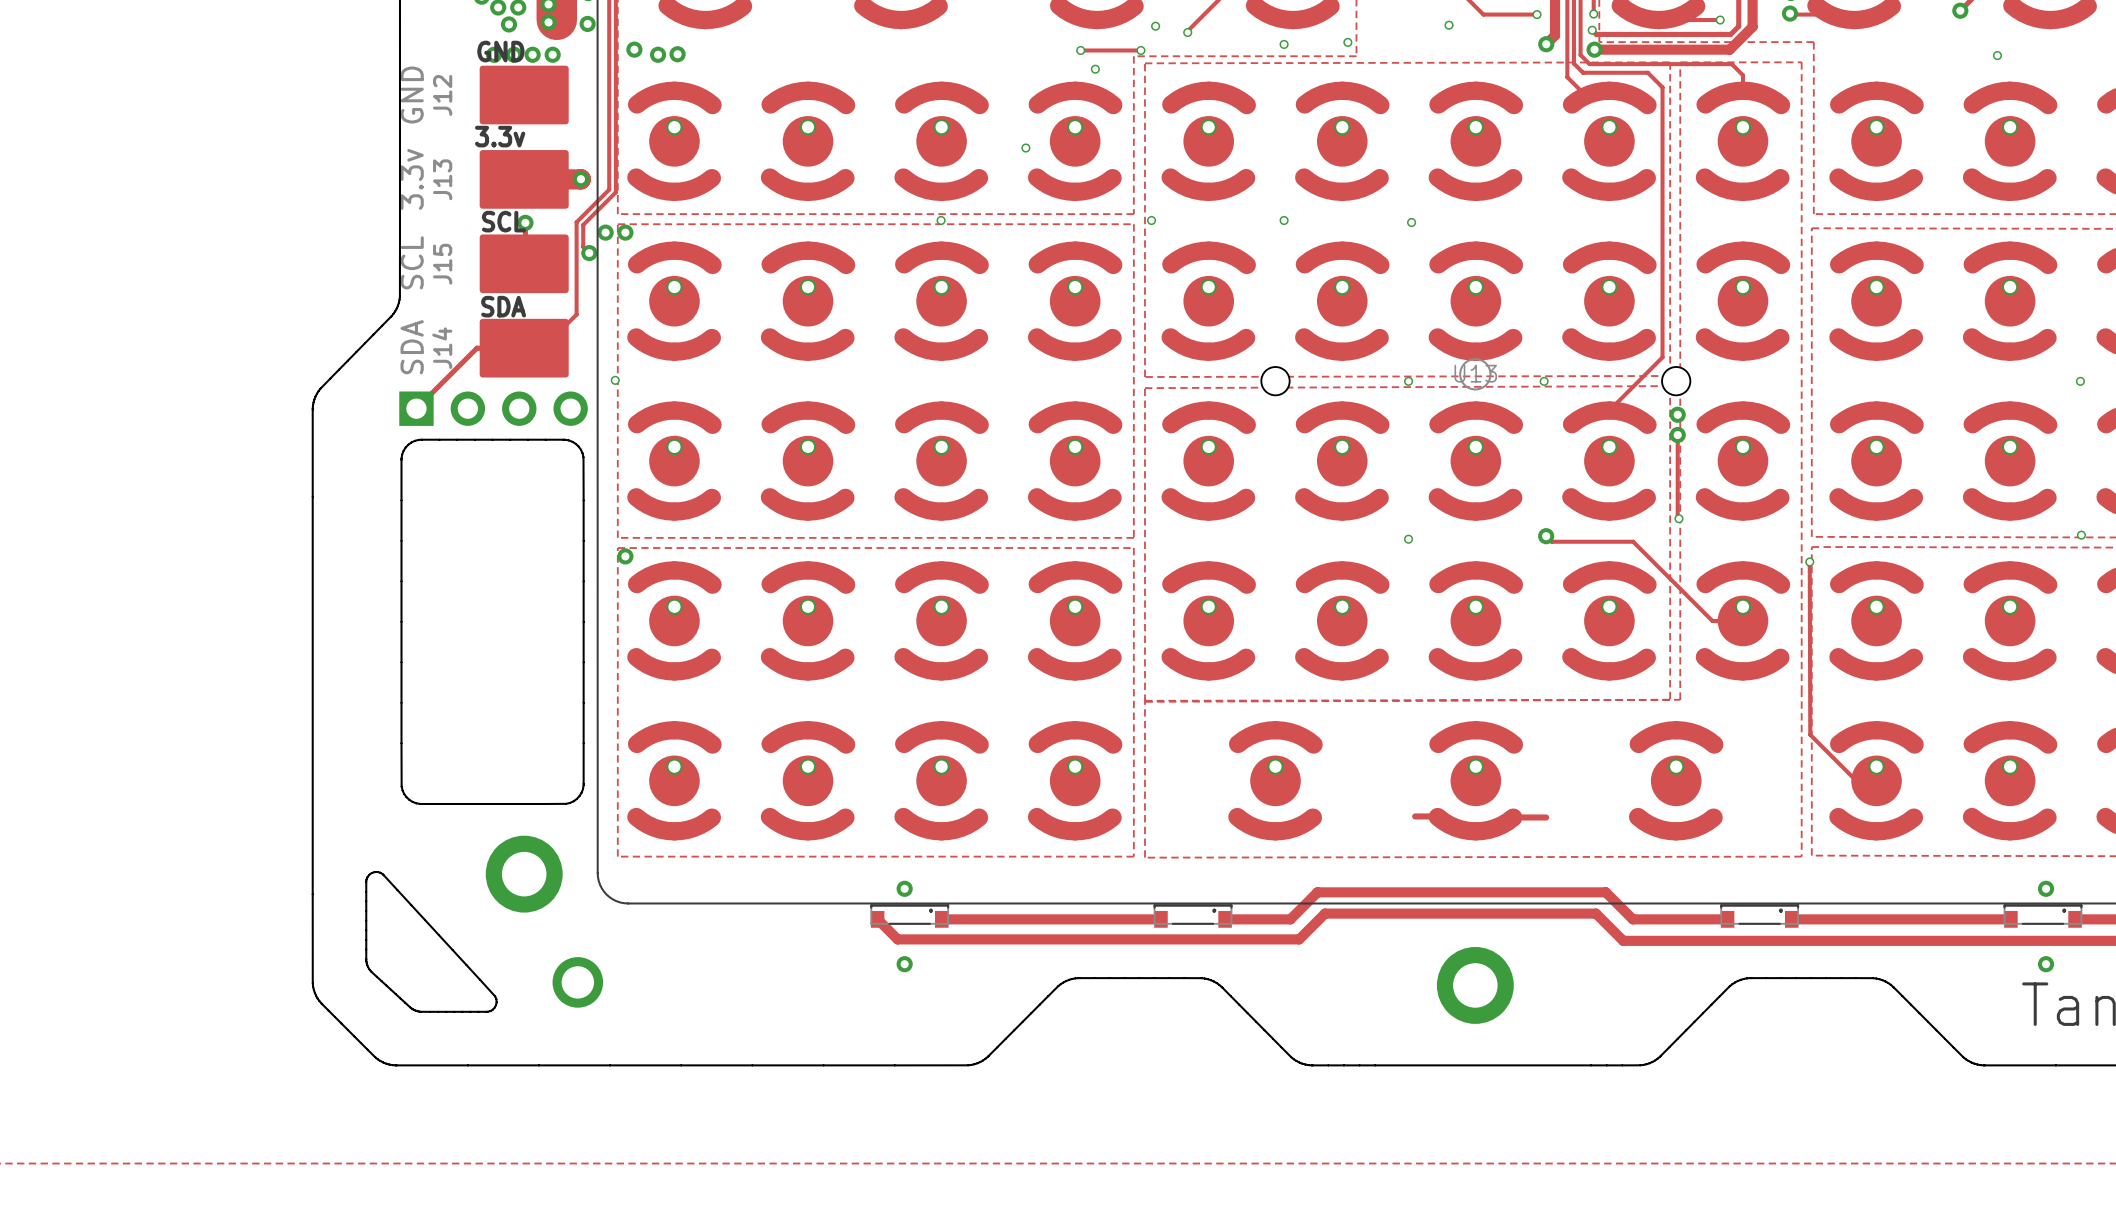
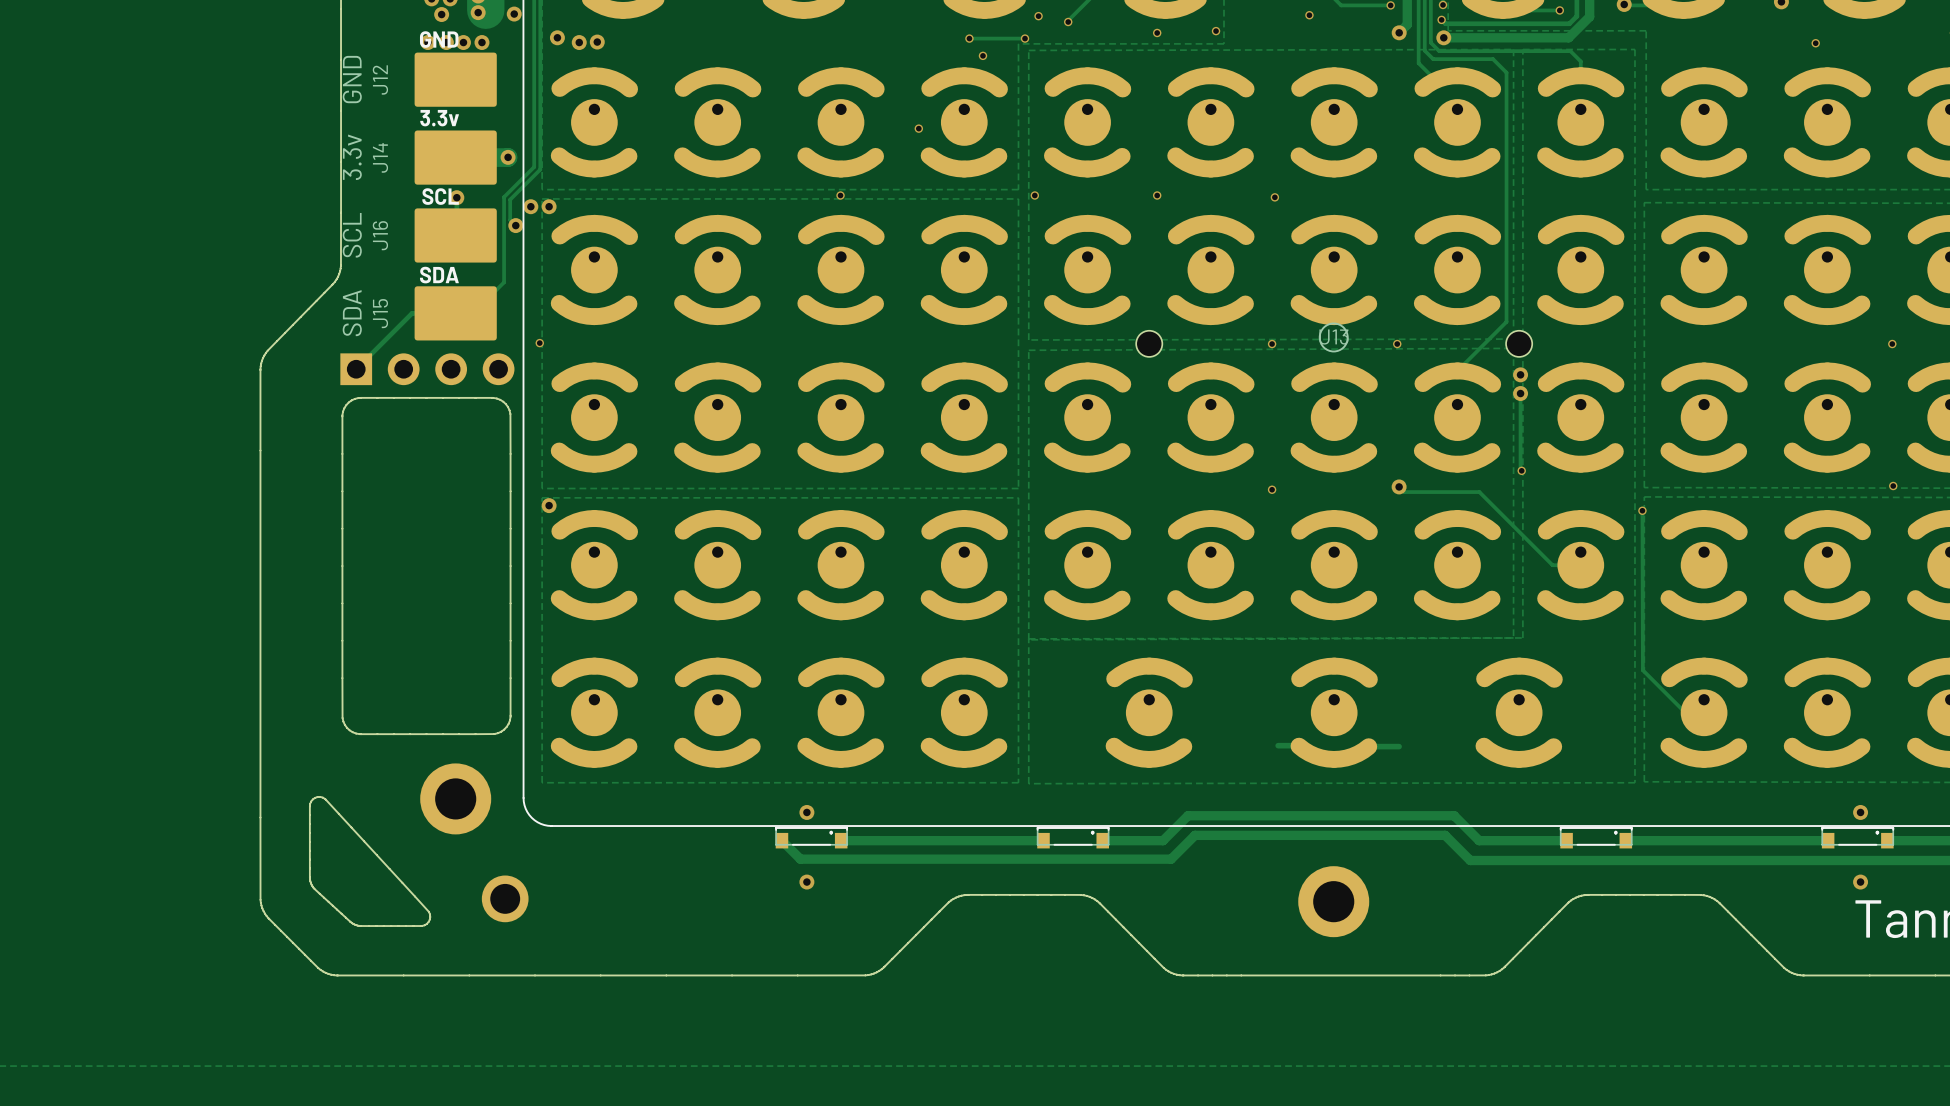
J13 name: J13 (442, 179) -> J14 (380, 157)
J15 name: J15 (442, 264) -> J16 (380, 235)
J14 name: J14 (442, 348) -> J15 (380, 313)

